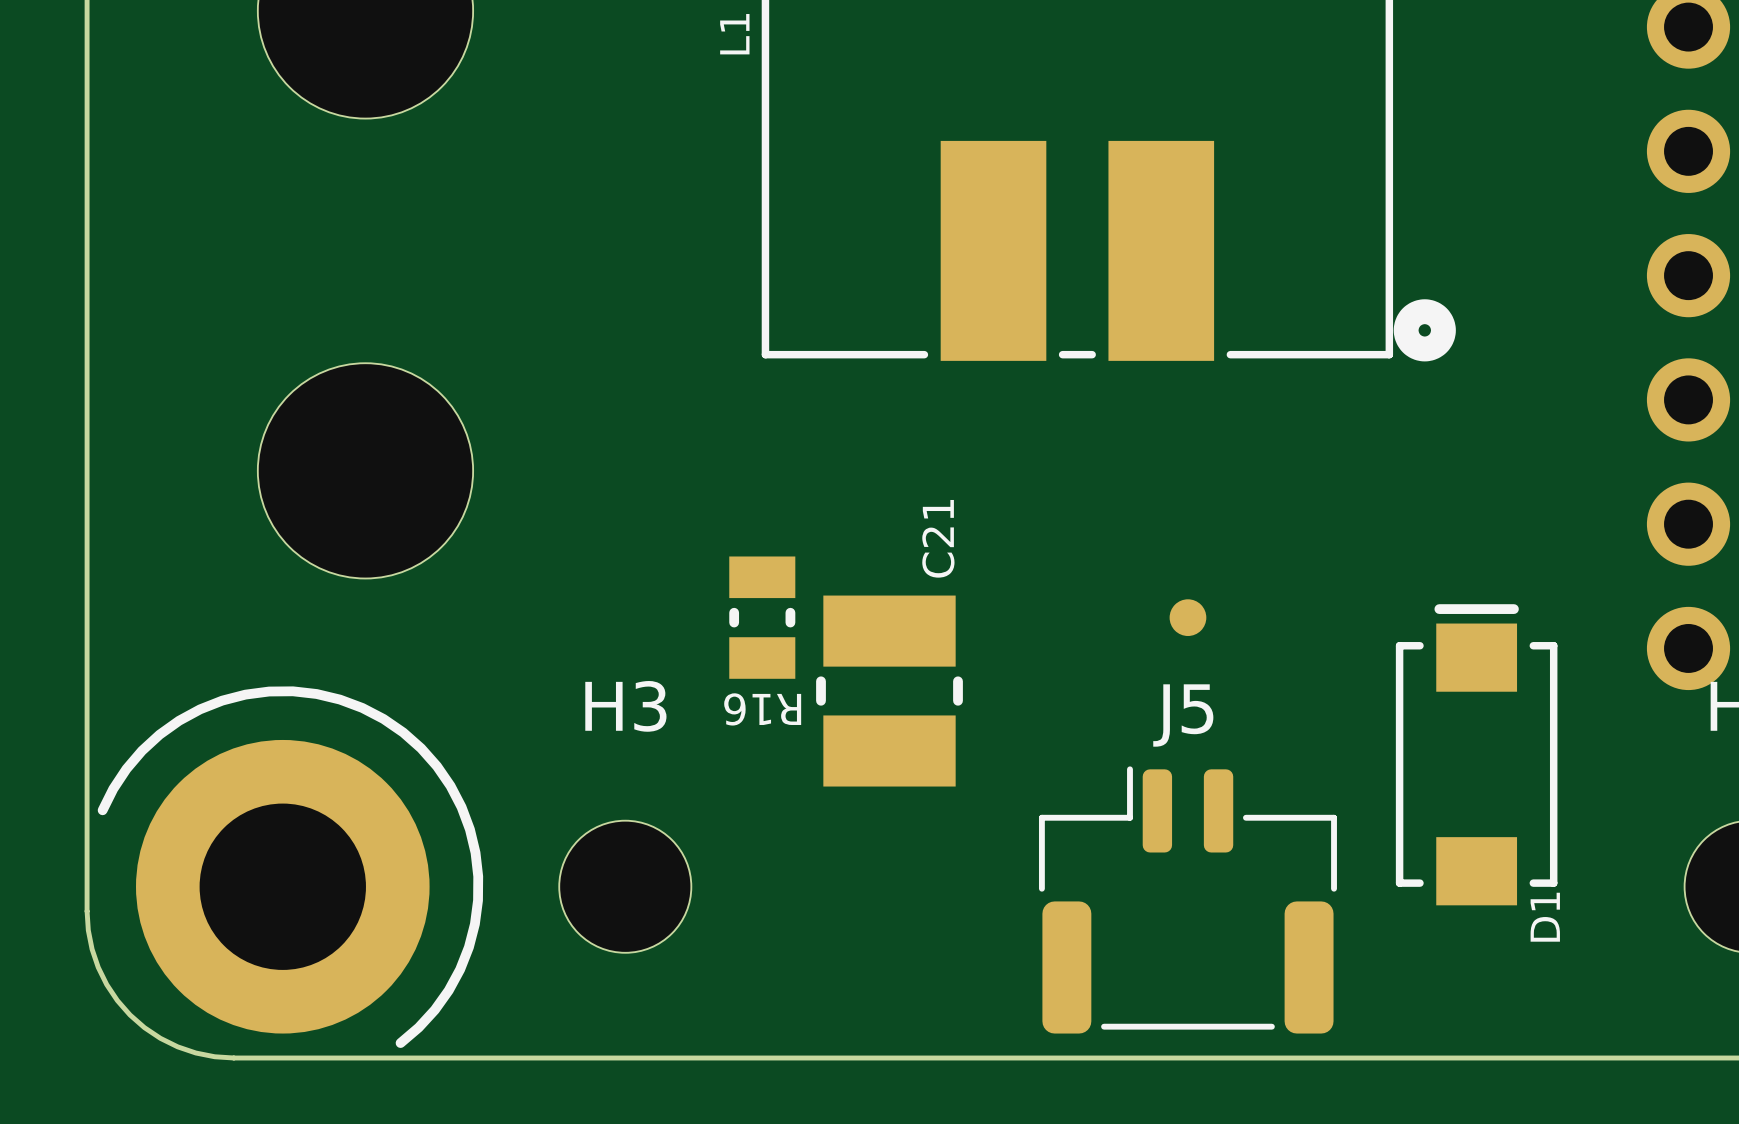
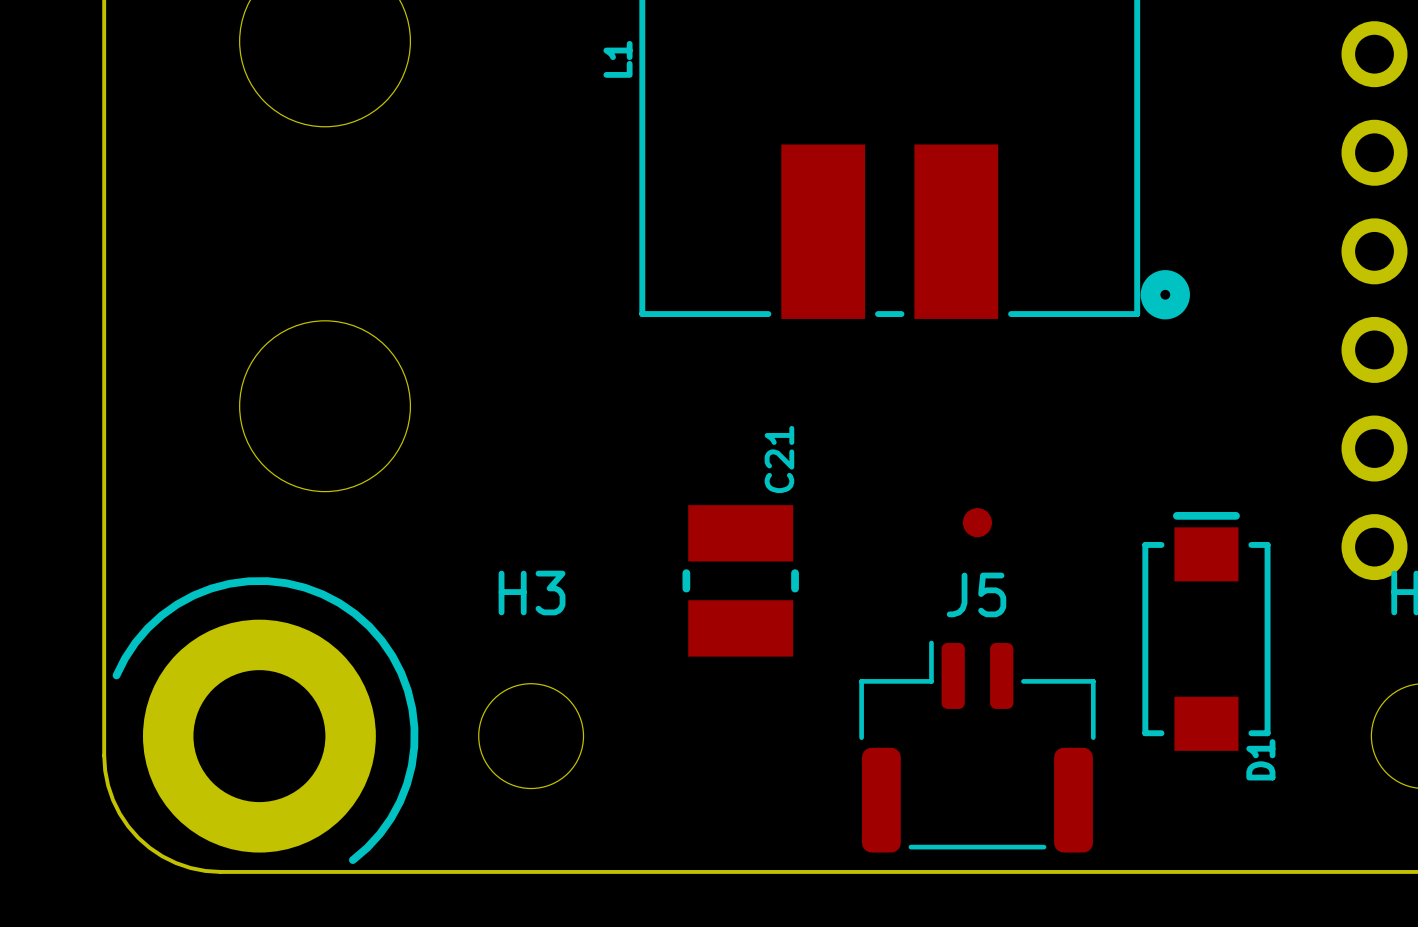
R16: (762, 617) -> none

